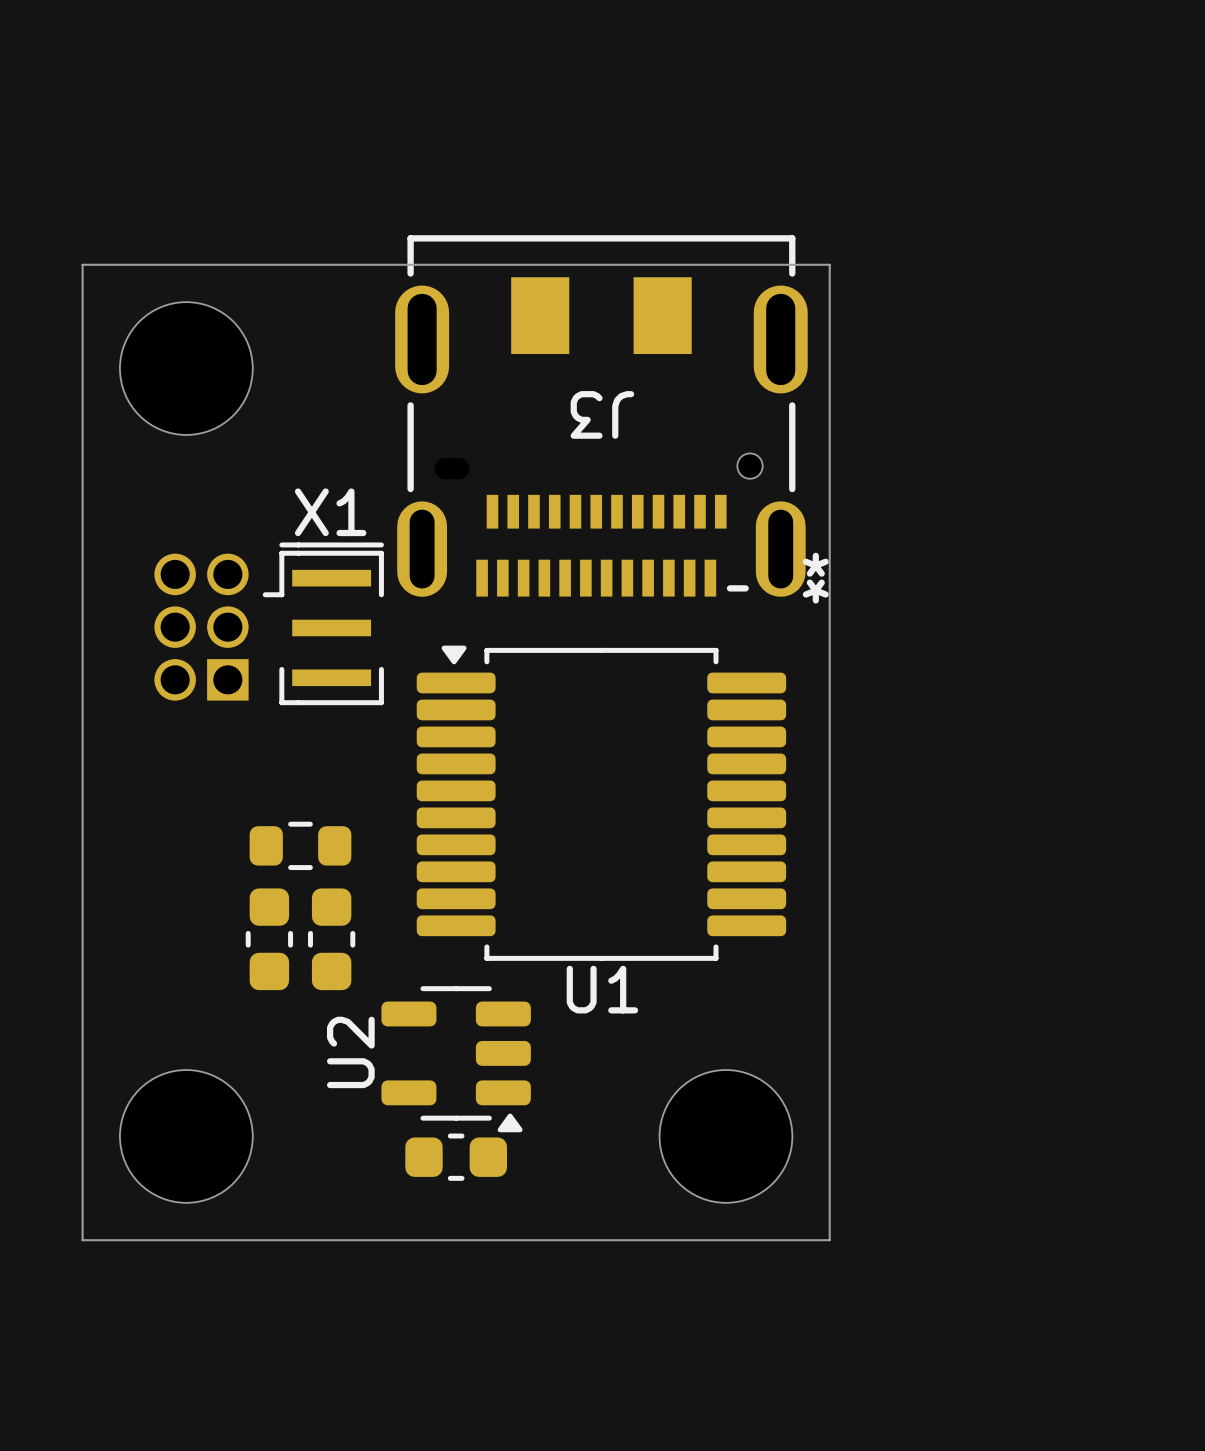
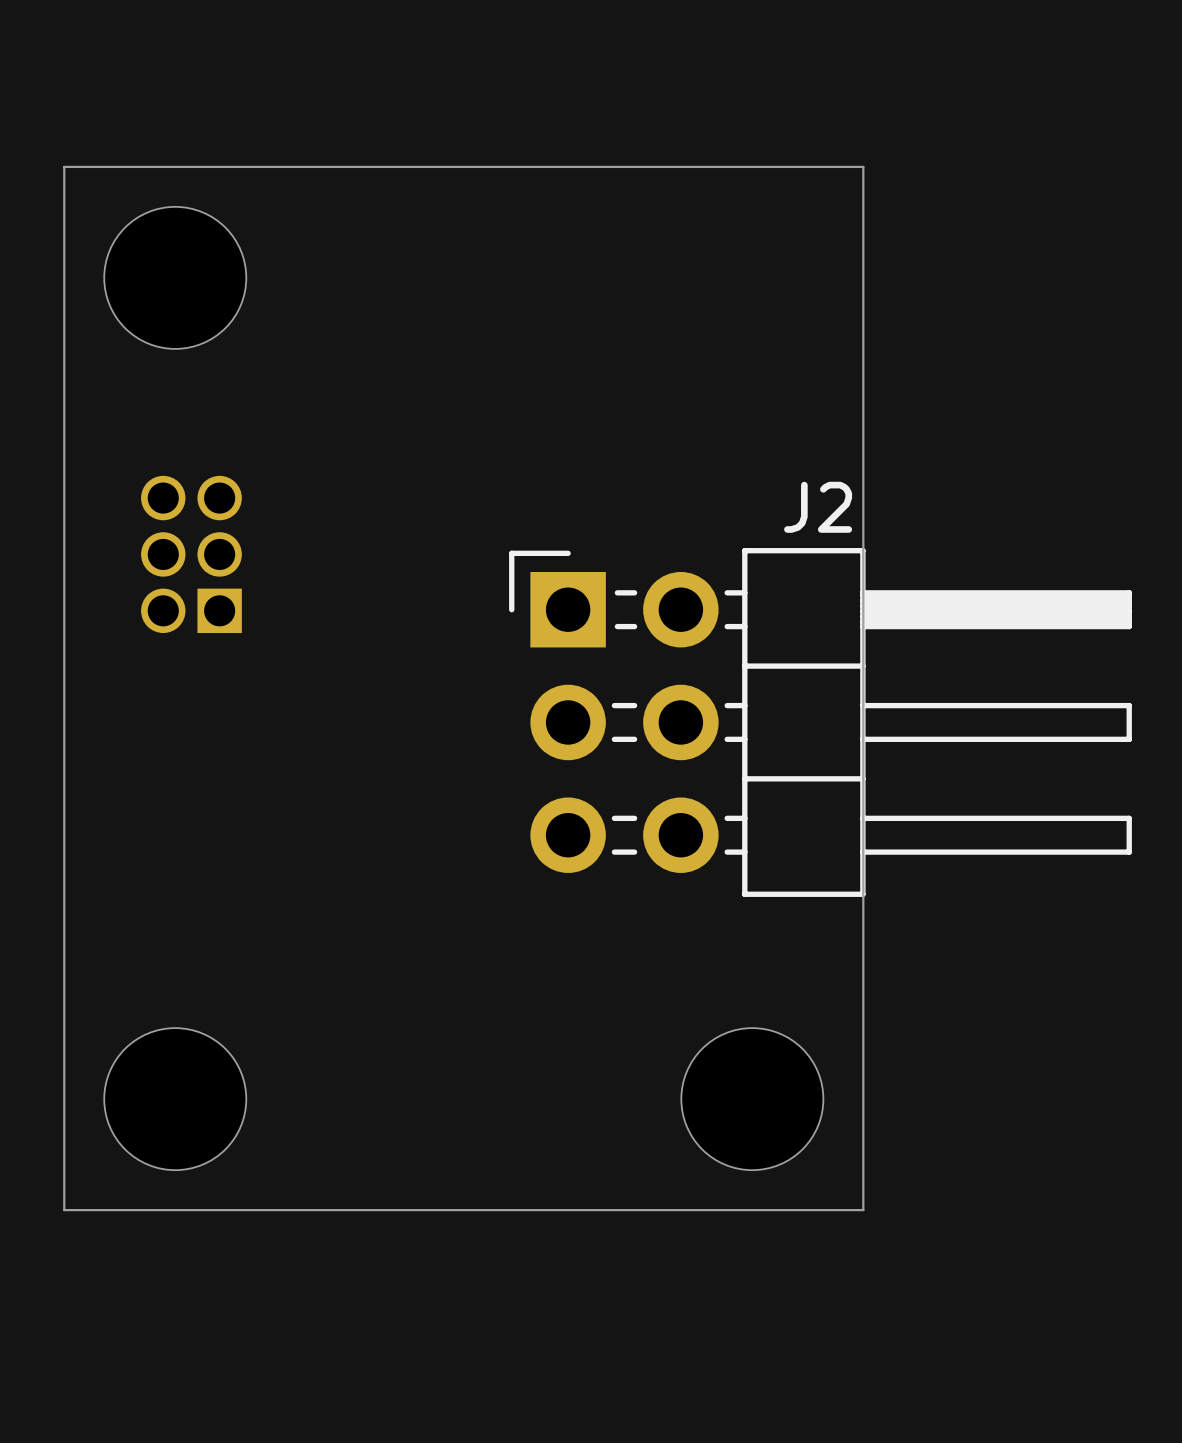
J3: (601, 416) -> none
X1: (323, 623) -> none
J2: none -> (820, 722)
U1: (601, 803) -> none
part: (300, 845) -> none
part: (269, 939) -> none
part: (331, 939) -> none
U2: (456, 1059) -> none
part: (456, 1157) -> none

